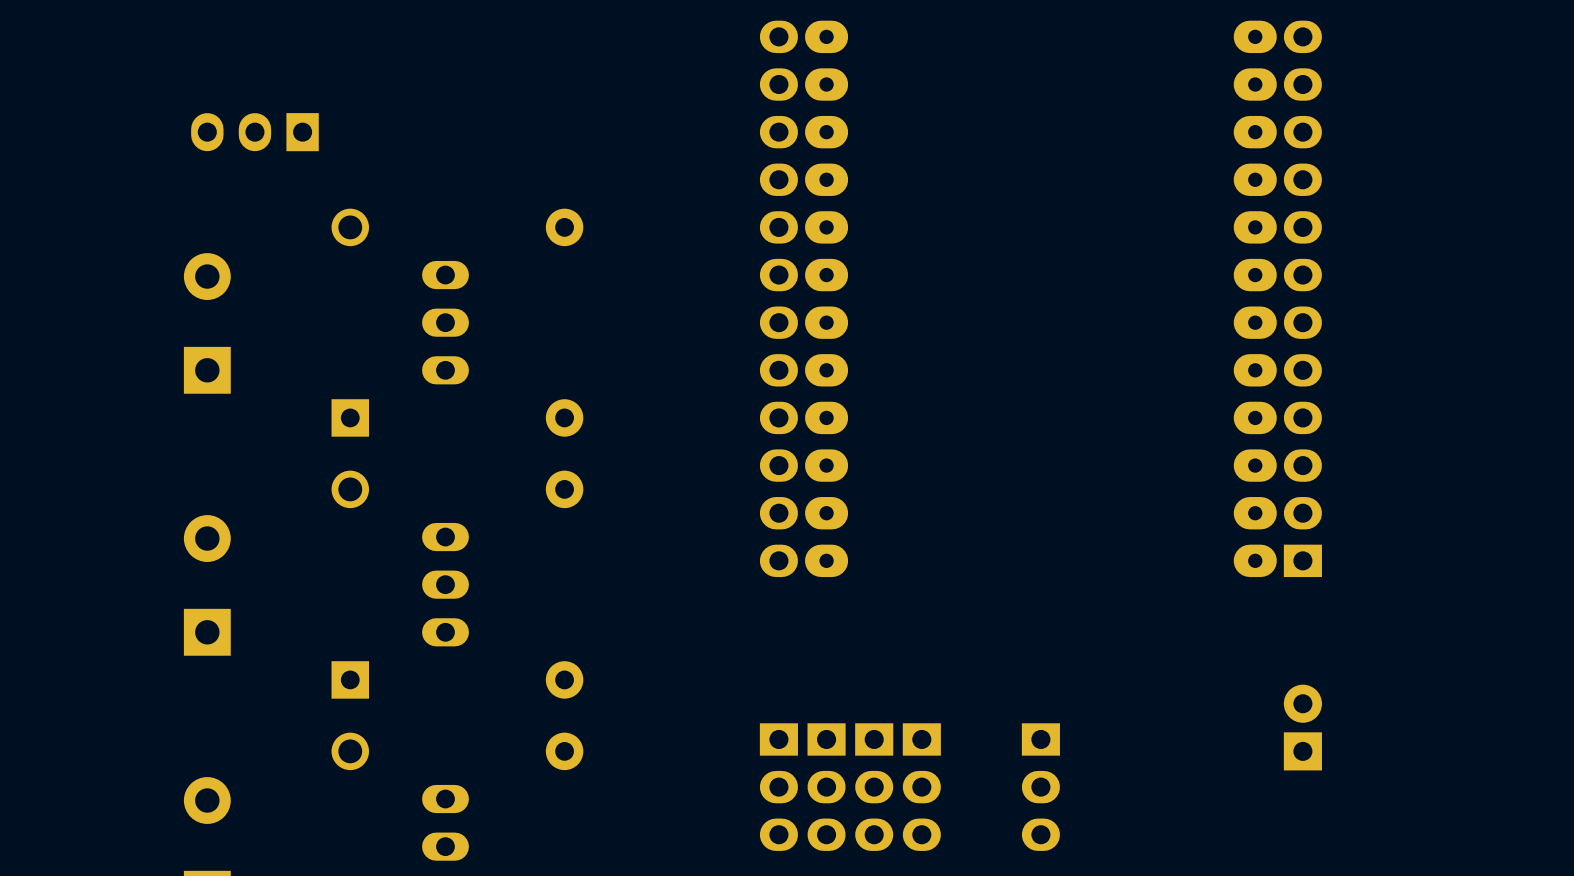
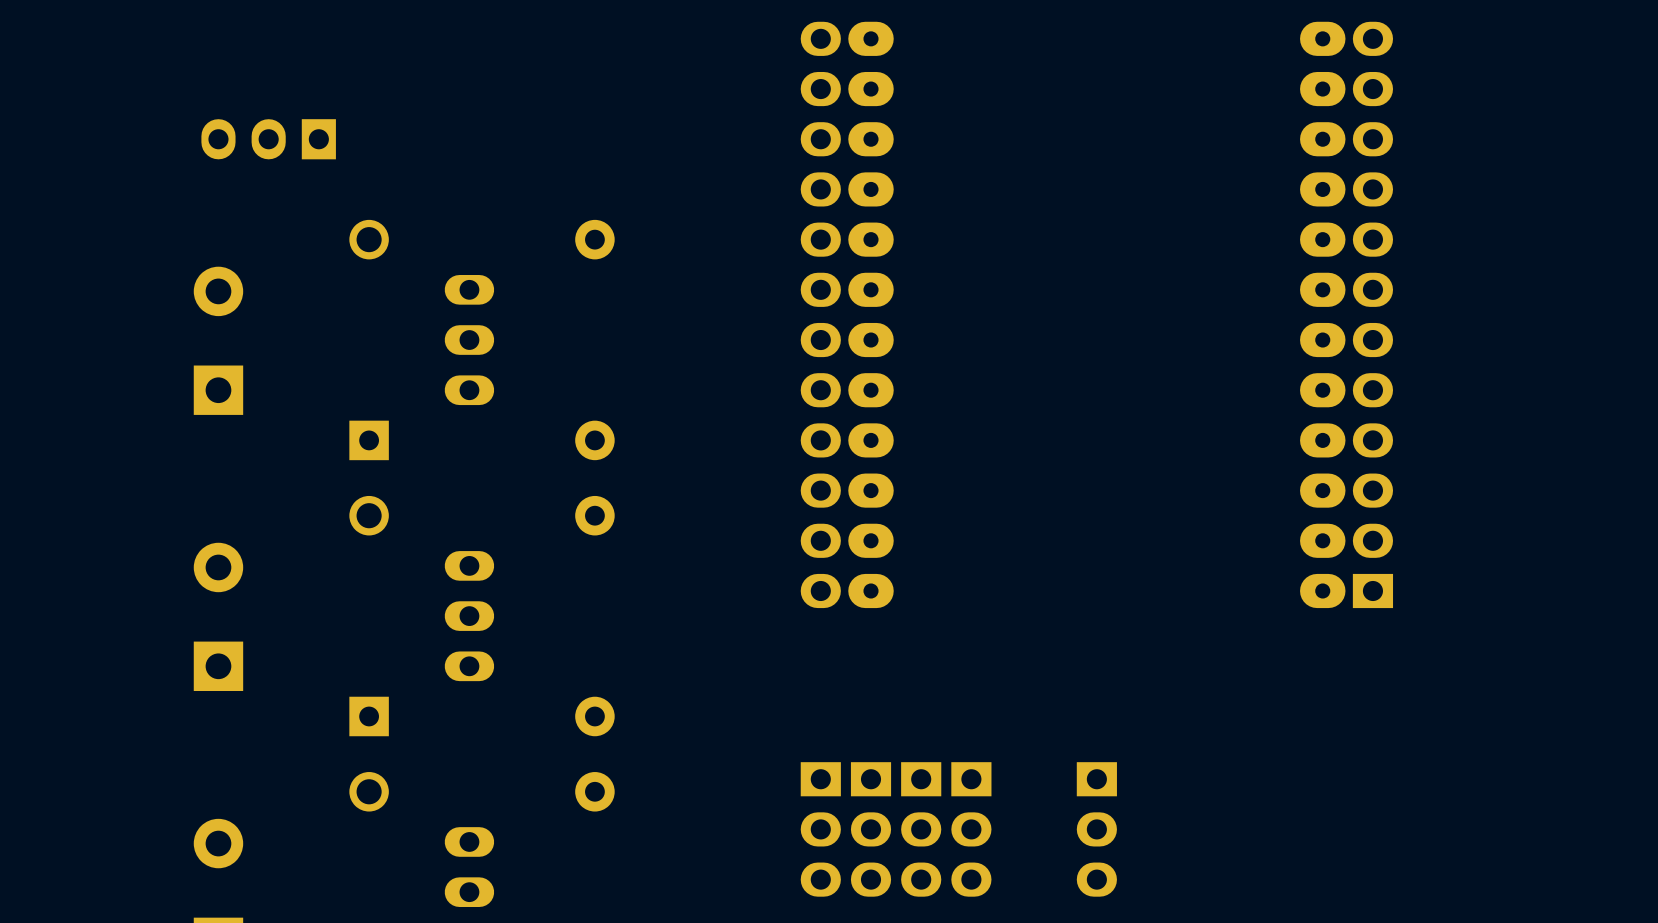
part: (1302, 727) -> none

